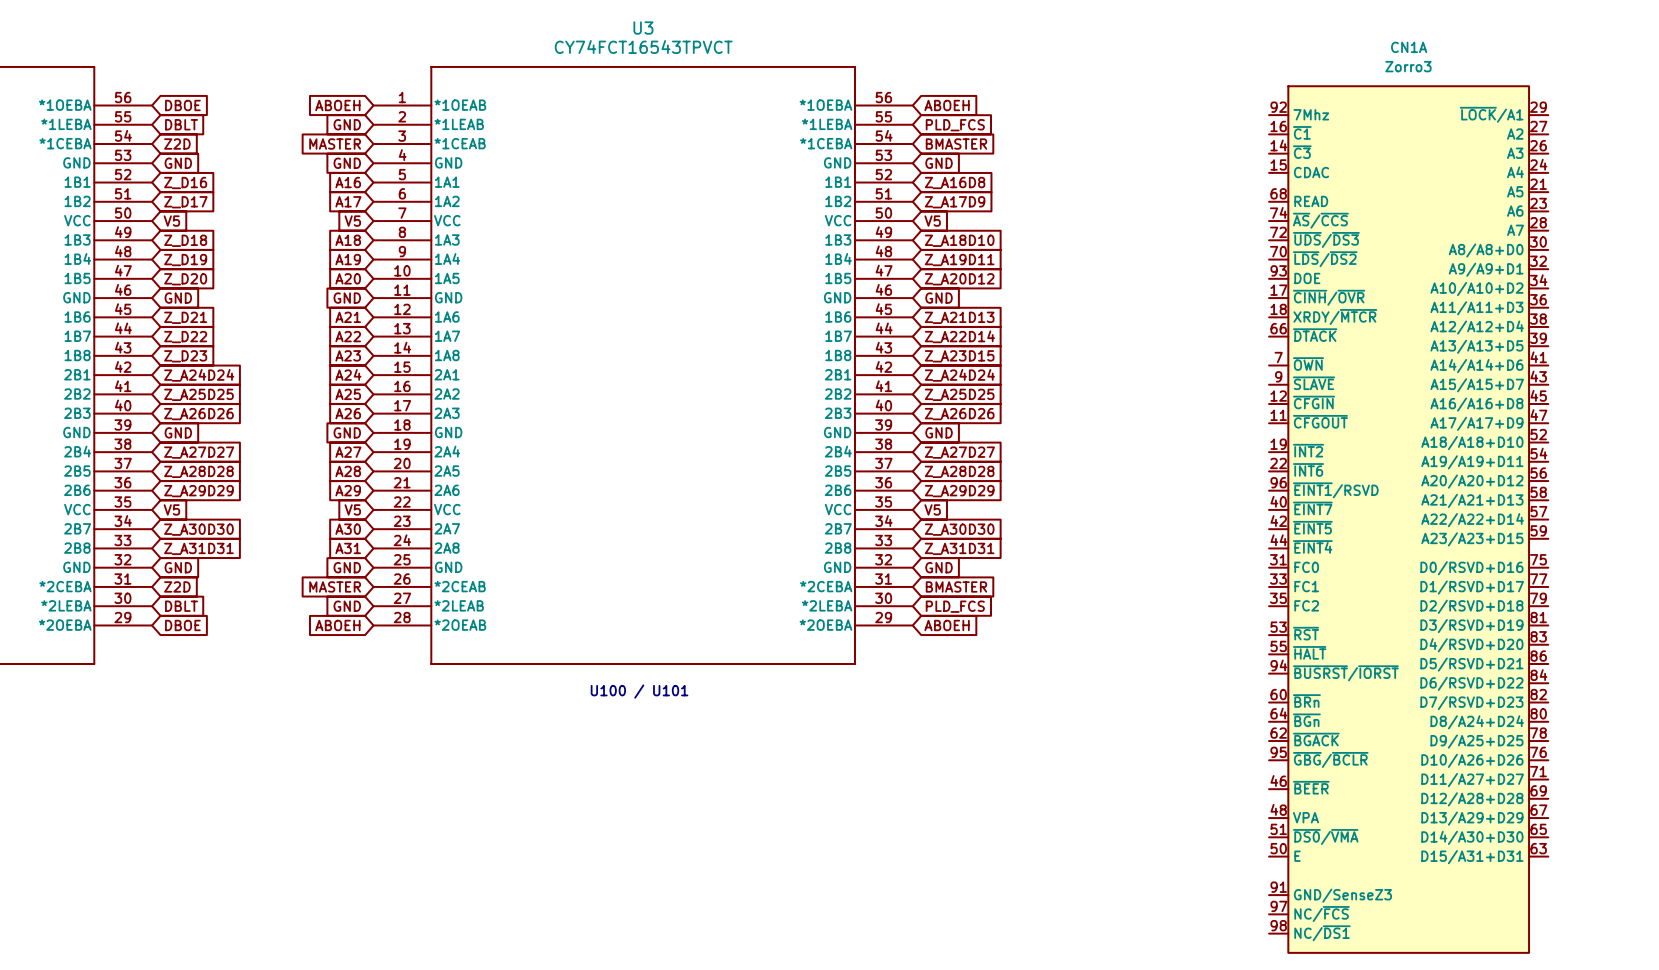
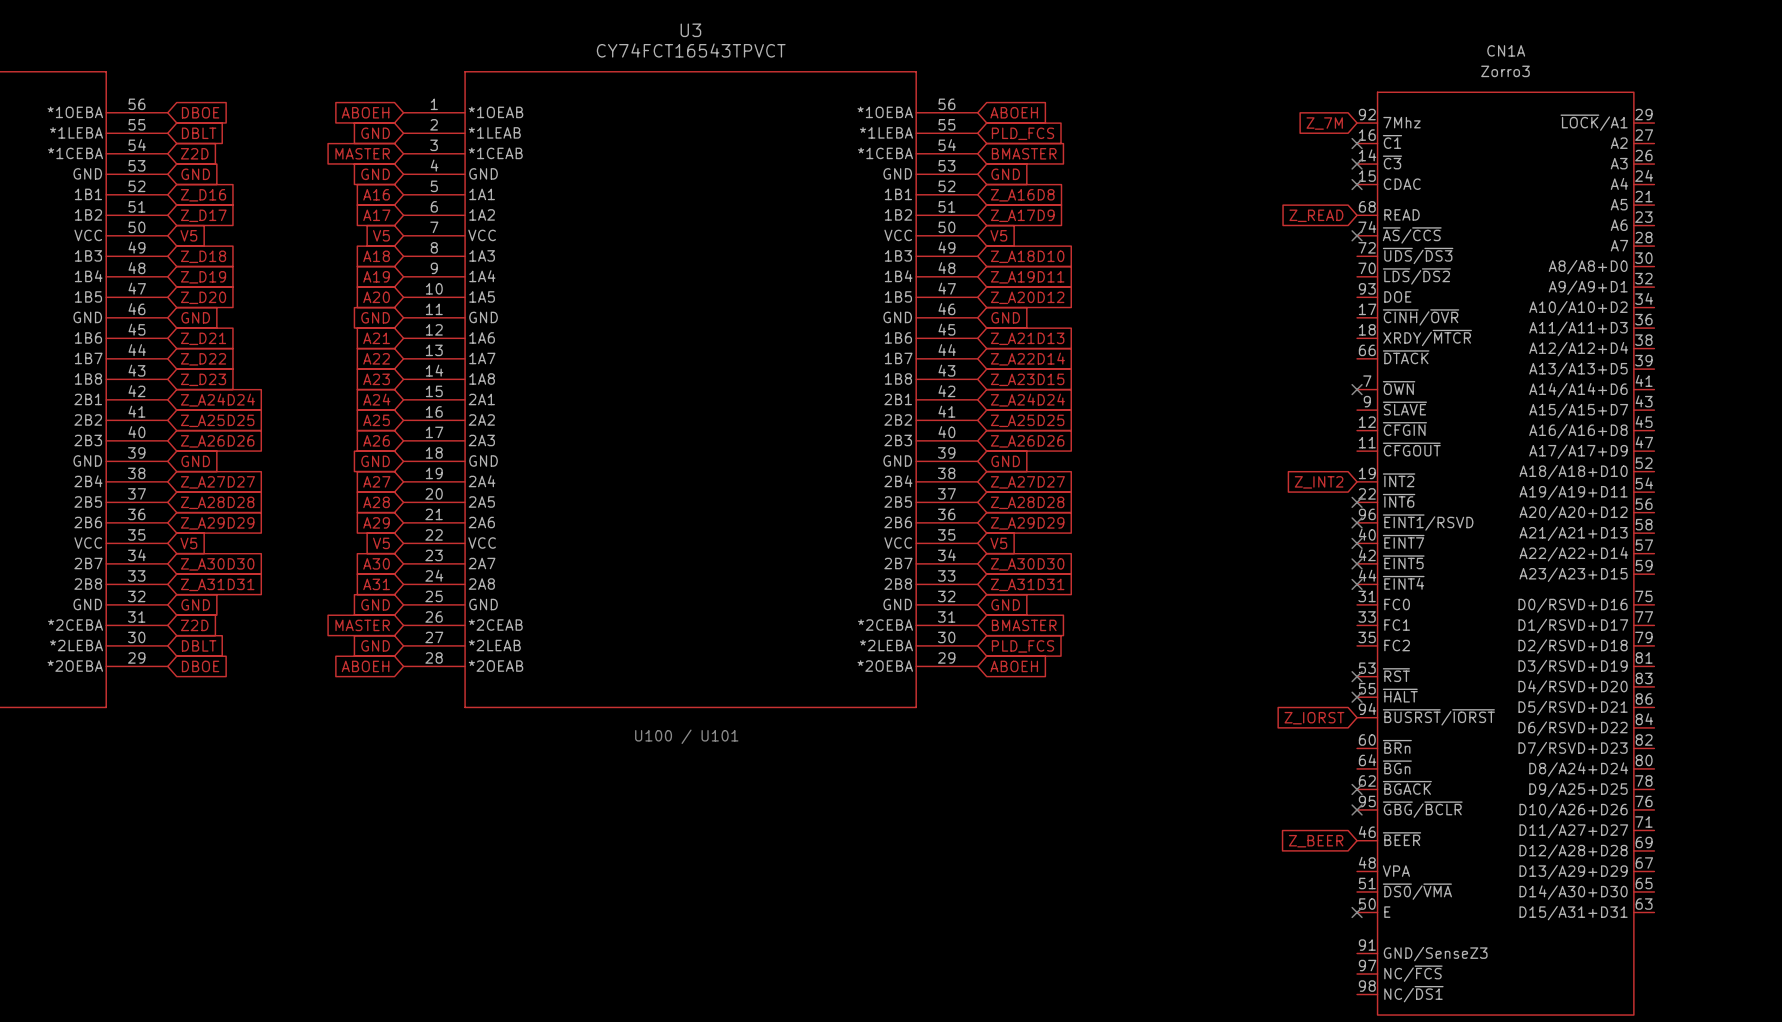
global label: none -> Z_7M (1324, 123)
no-connect mark: none -> (1357, 143)
no-connect mark: none -> (1357, 164)
no-connect mark: none -> (1357, 184)
global label: none -> Z_READ (1316, 215)
no-connect mark: none -> (1357, 235)
no-connect mark: none -> (1357, 389)
global label: none -> Z_INT2 (1319, 482)
no-connect mark: none -> (1357, 502)
no-connect mark: none -> (1357, 522)
no-connect mark: none -> (1357, 543)
no-connect mark: none -> (1357, 563)
no-connect mark: none -> (1357, 584)
no-connect mark: none -> (1357, 676)
no-connect mark: none -> (1357, 697)
global label: none -> Z_IORST (1314, 718)
no-connect mark: none -> (1357, 789)
no-connect mark: none -> (1357, 809)
global label: none -> Z_BEER (1316, 841)
no-connect mark: none -> (1357, 912)

